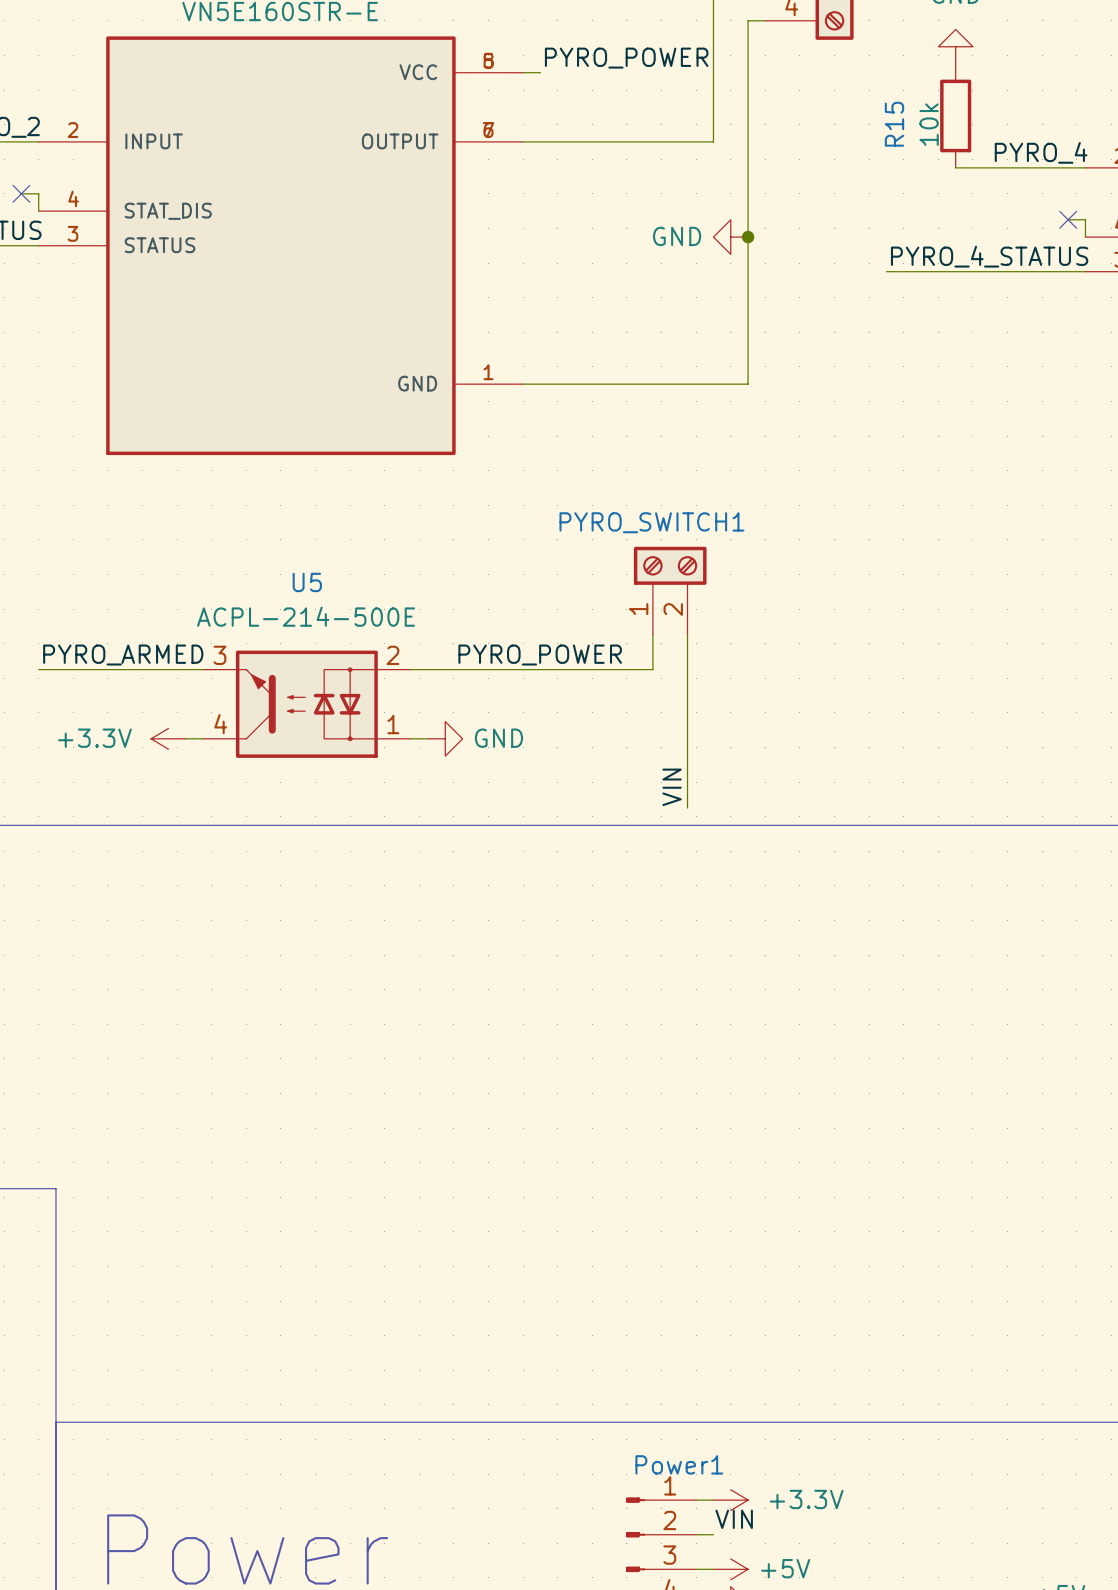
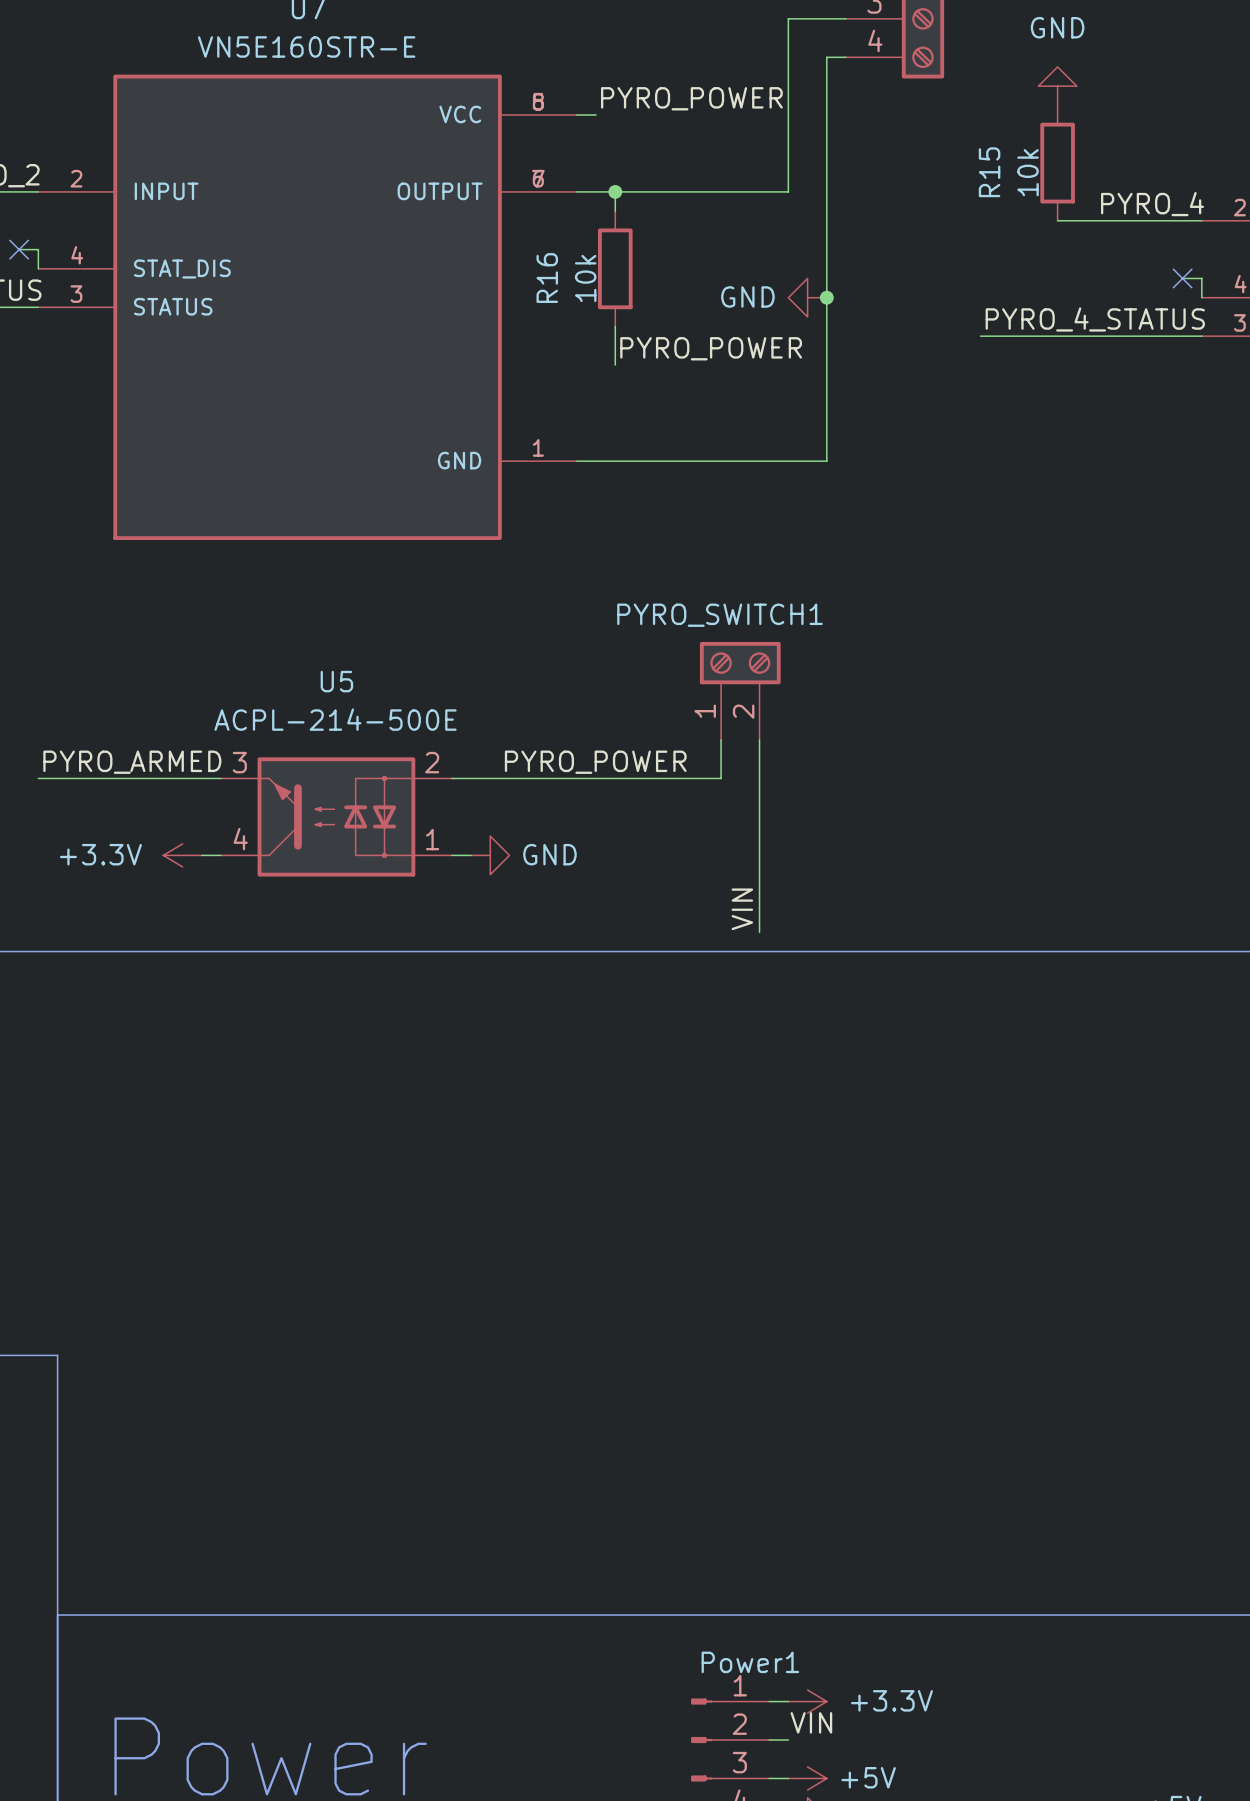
wire: none -> (615, 191) (615, 211)
junction: none -> (615, 191)
R16: none -> 10k (615, 268)
wire: none -> (615, 326) (615, 365)
label: none -> PYRO_POWER (711, 348)

